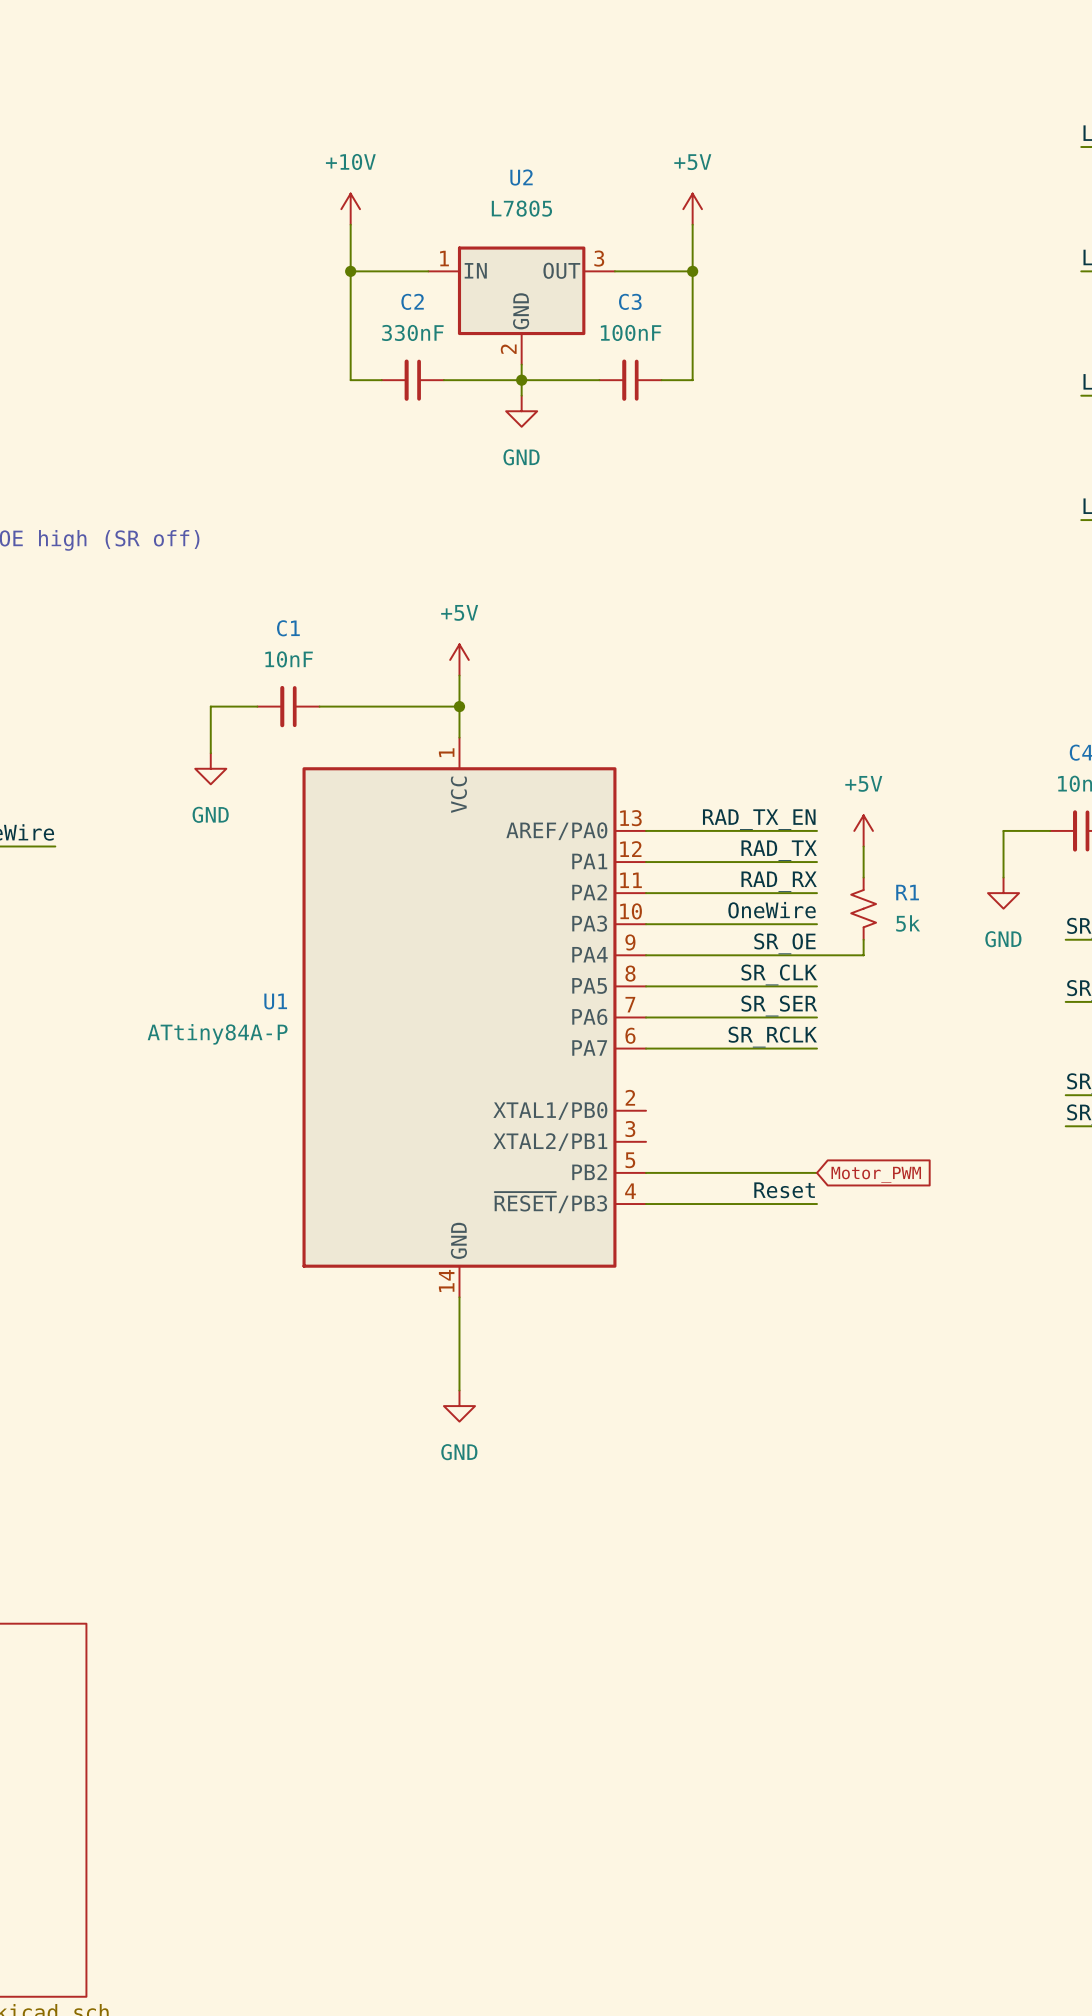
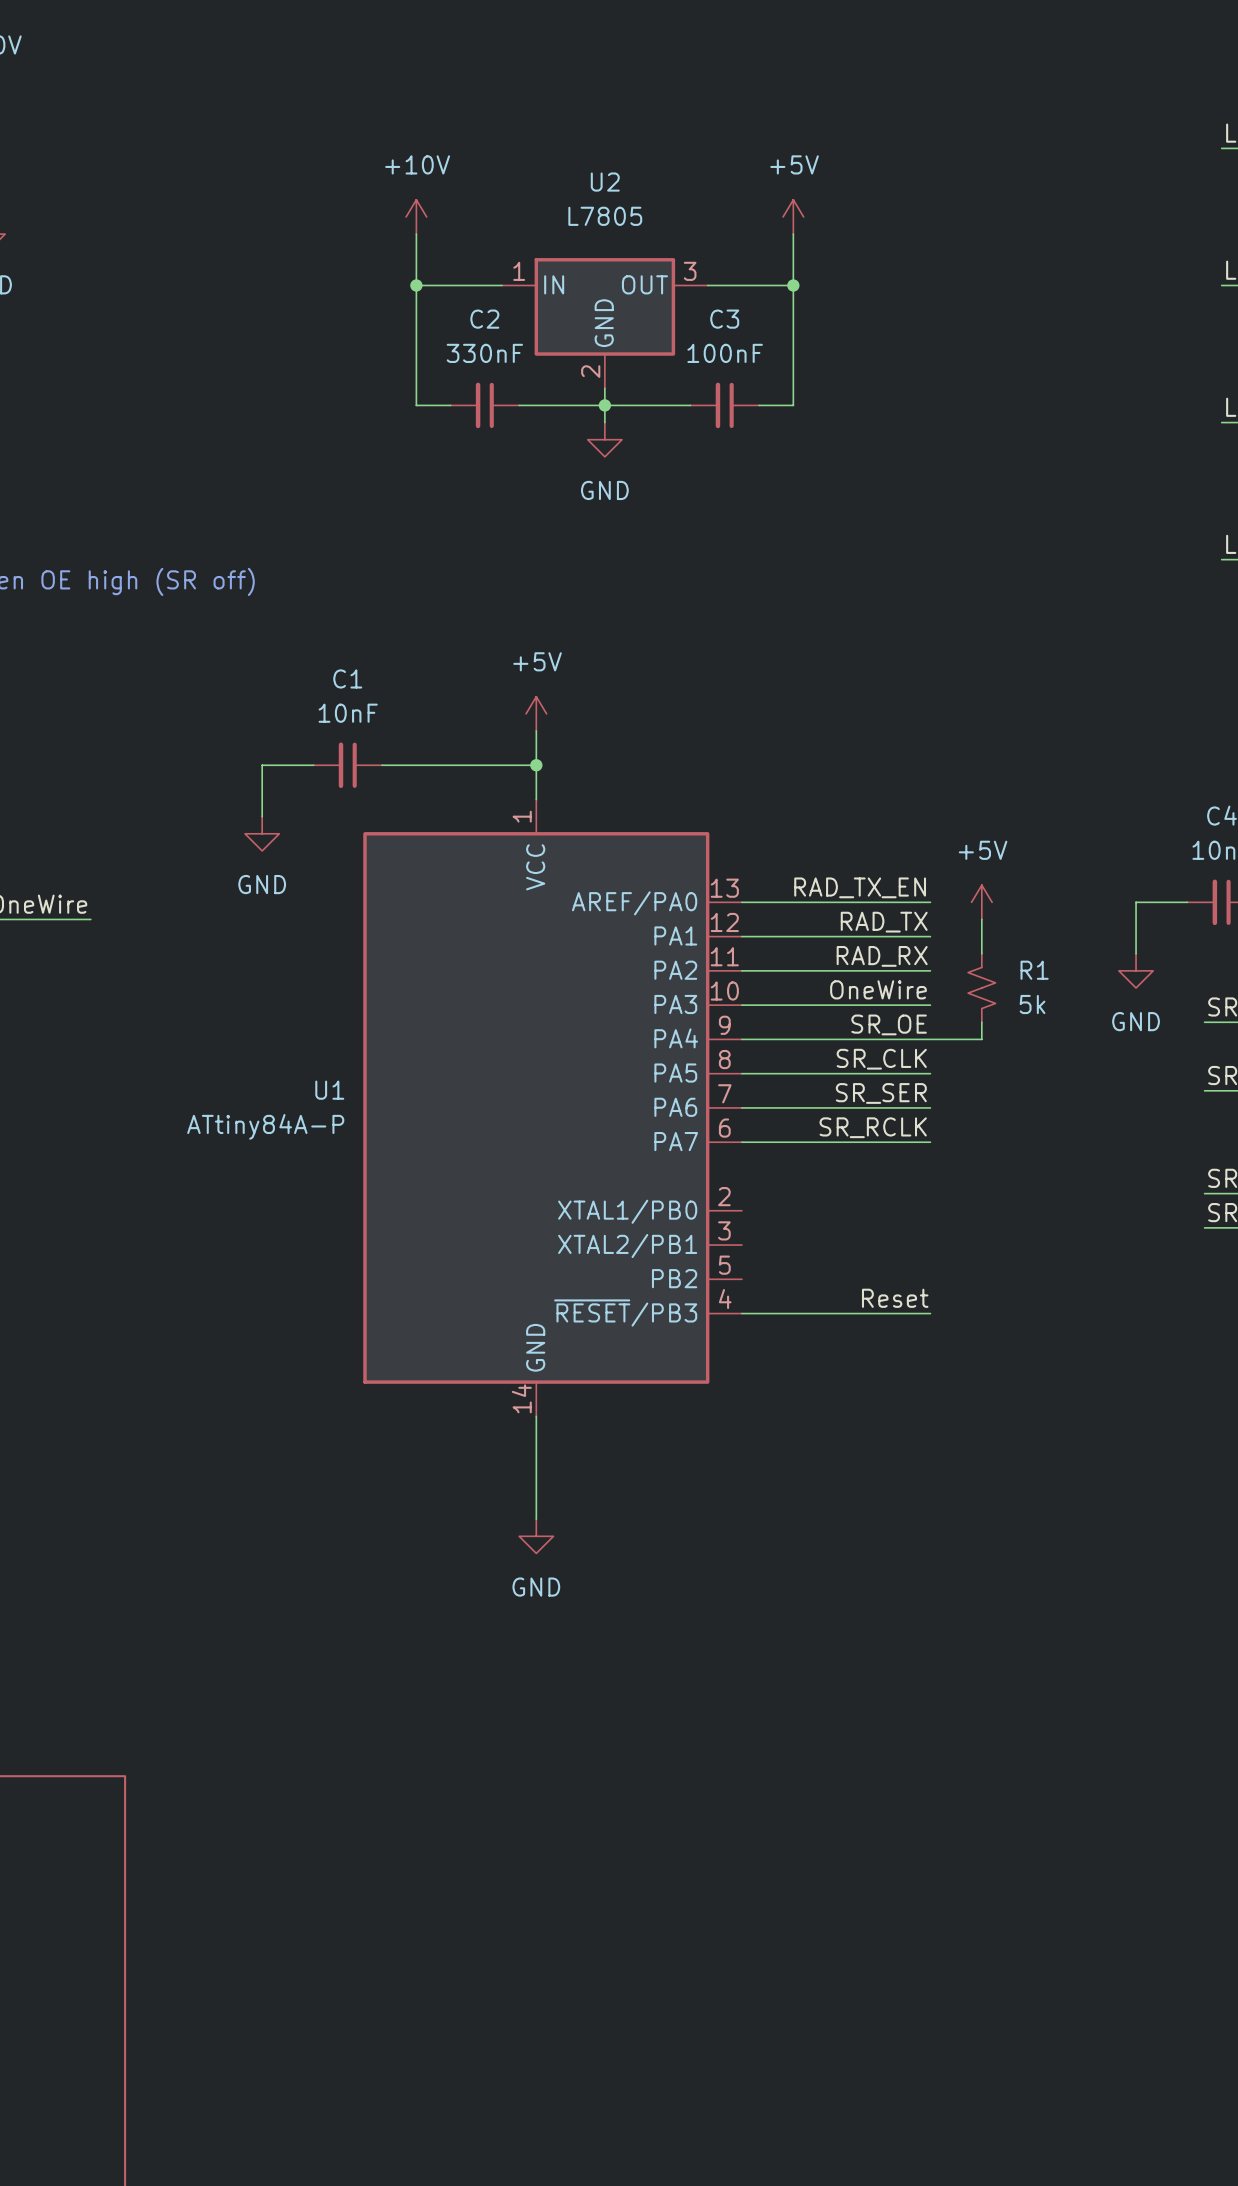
wire: (646, 1172) (817, 1172) -> none
global label: Motor_PWM (876, 1174) -> none

